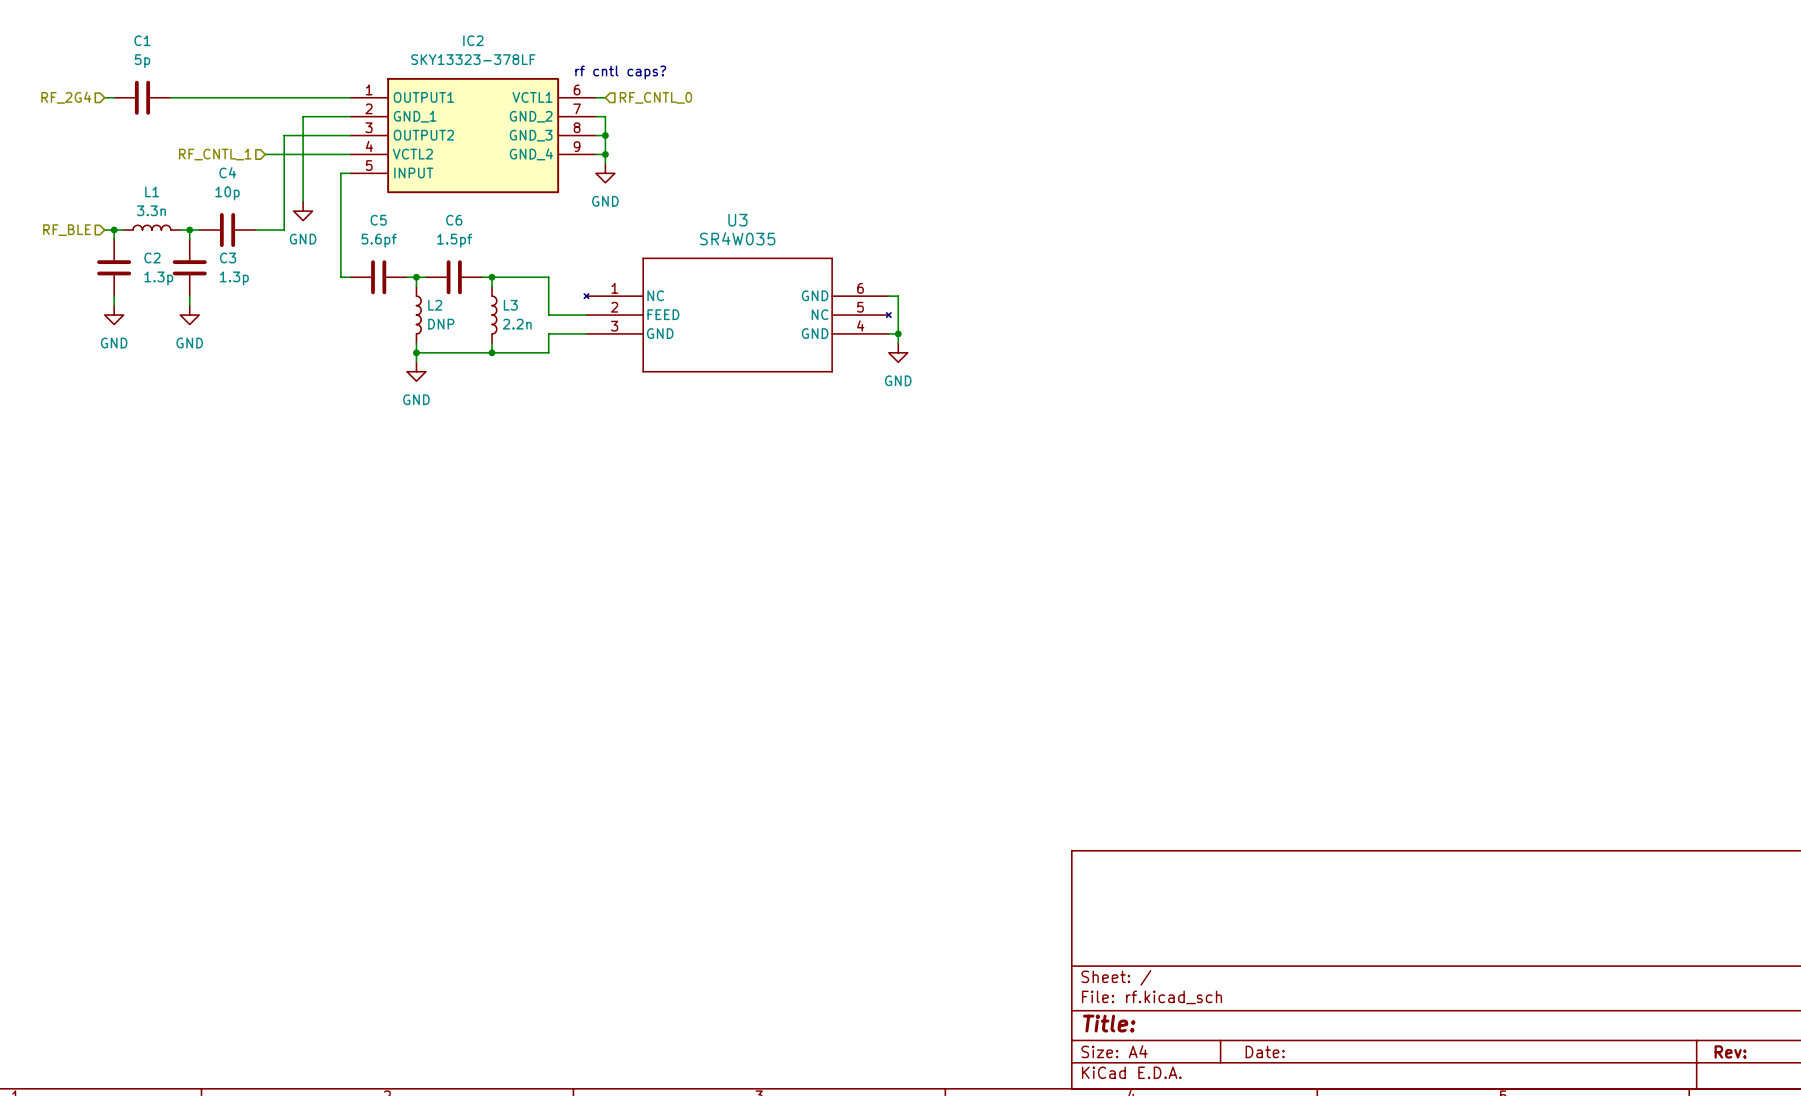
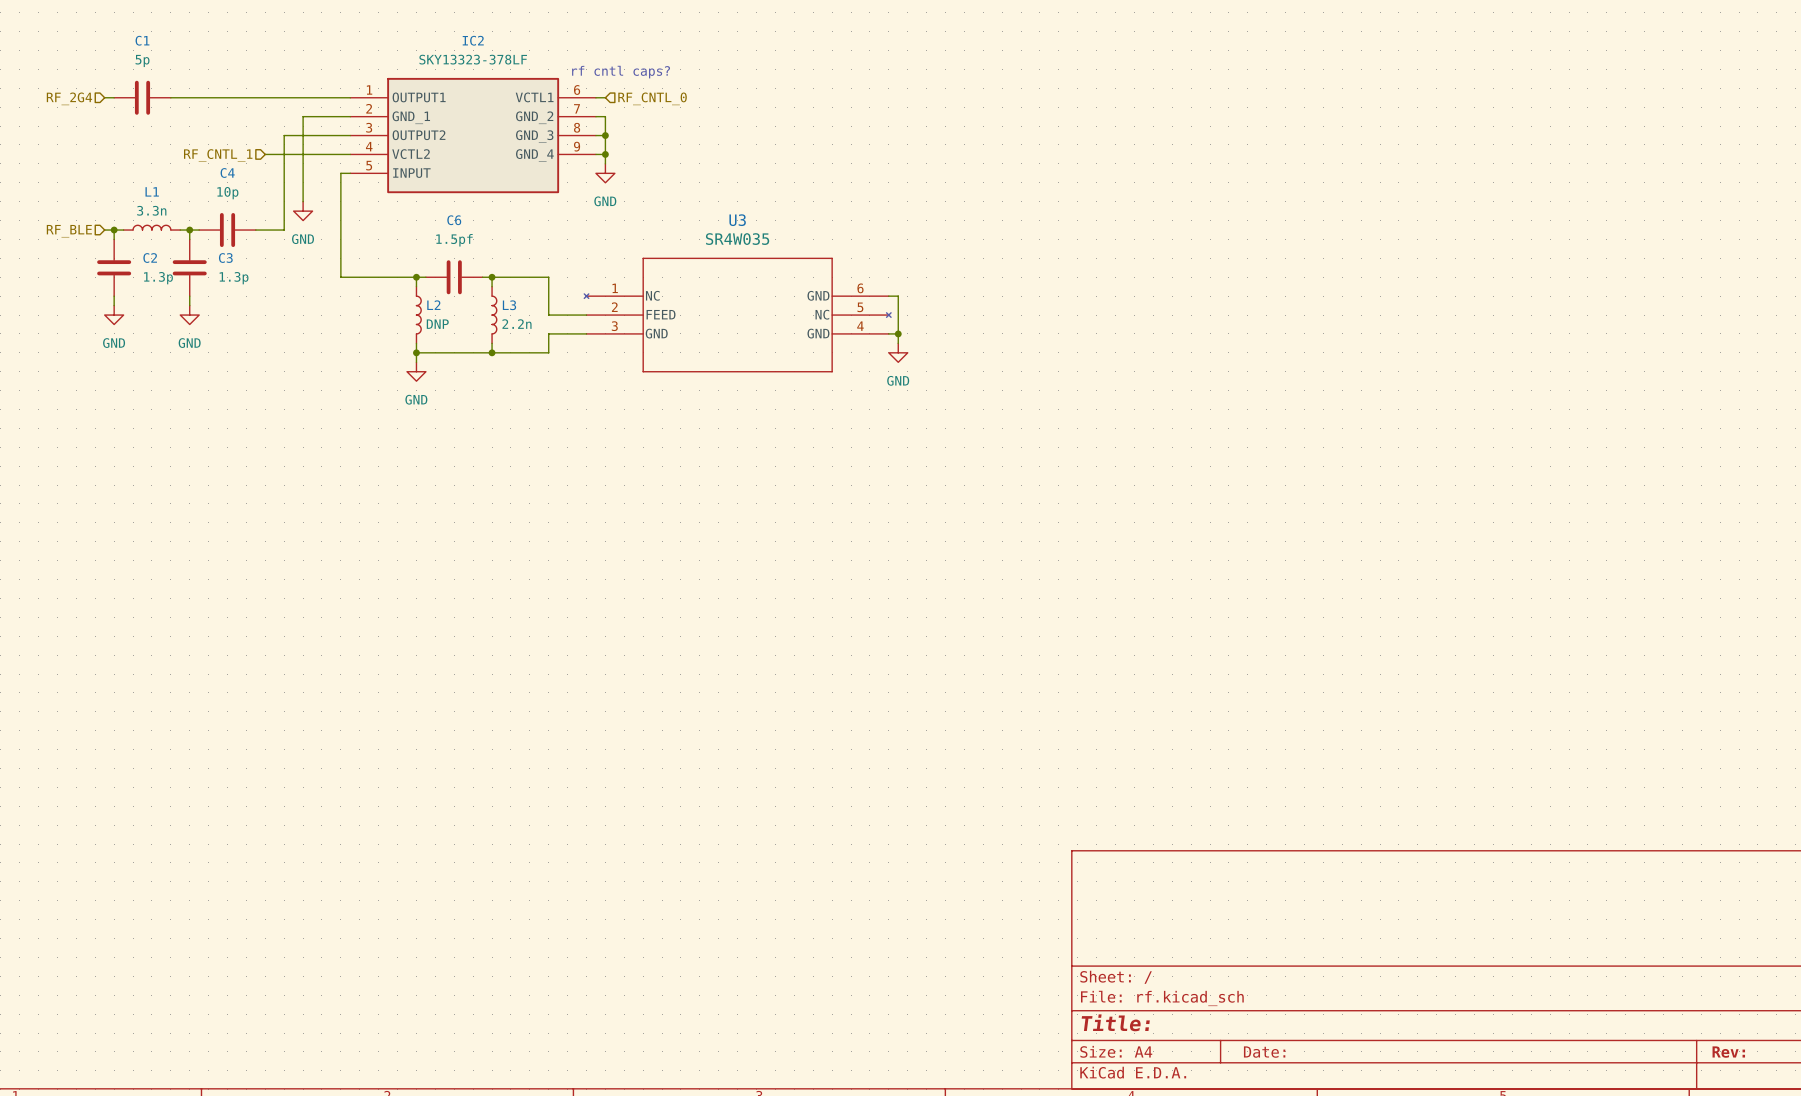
C5: 5.6pf (378, 277) -> none

